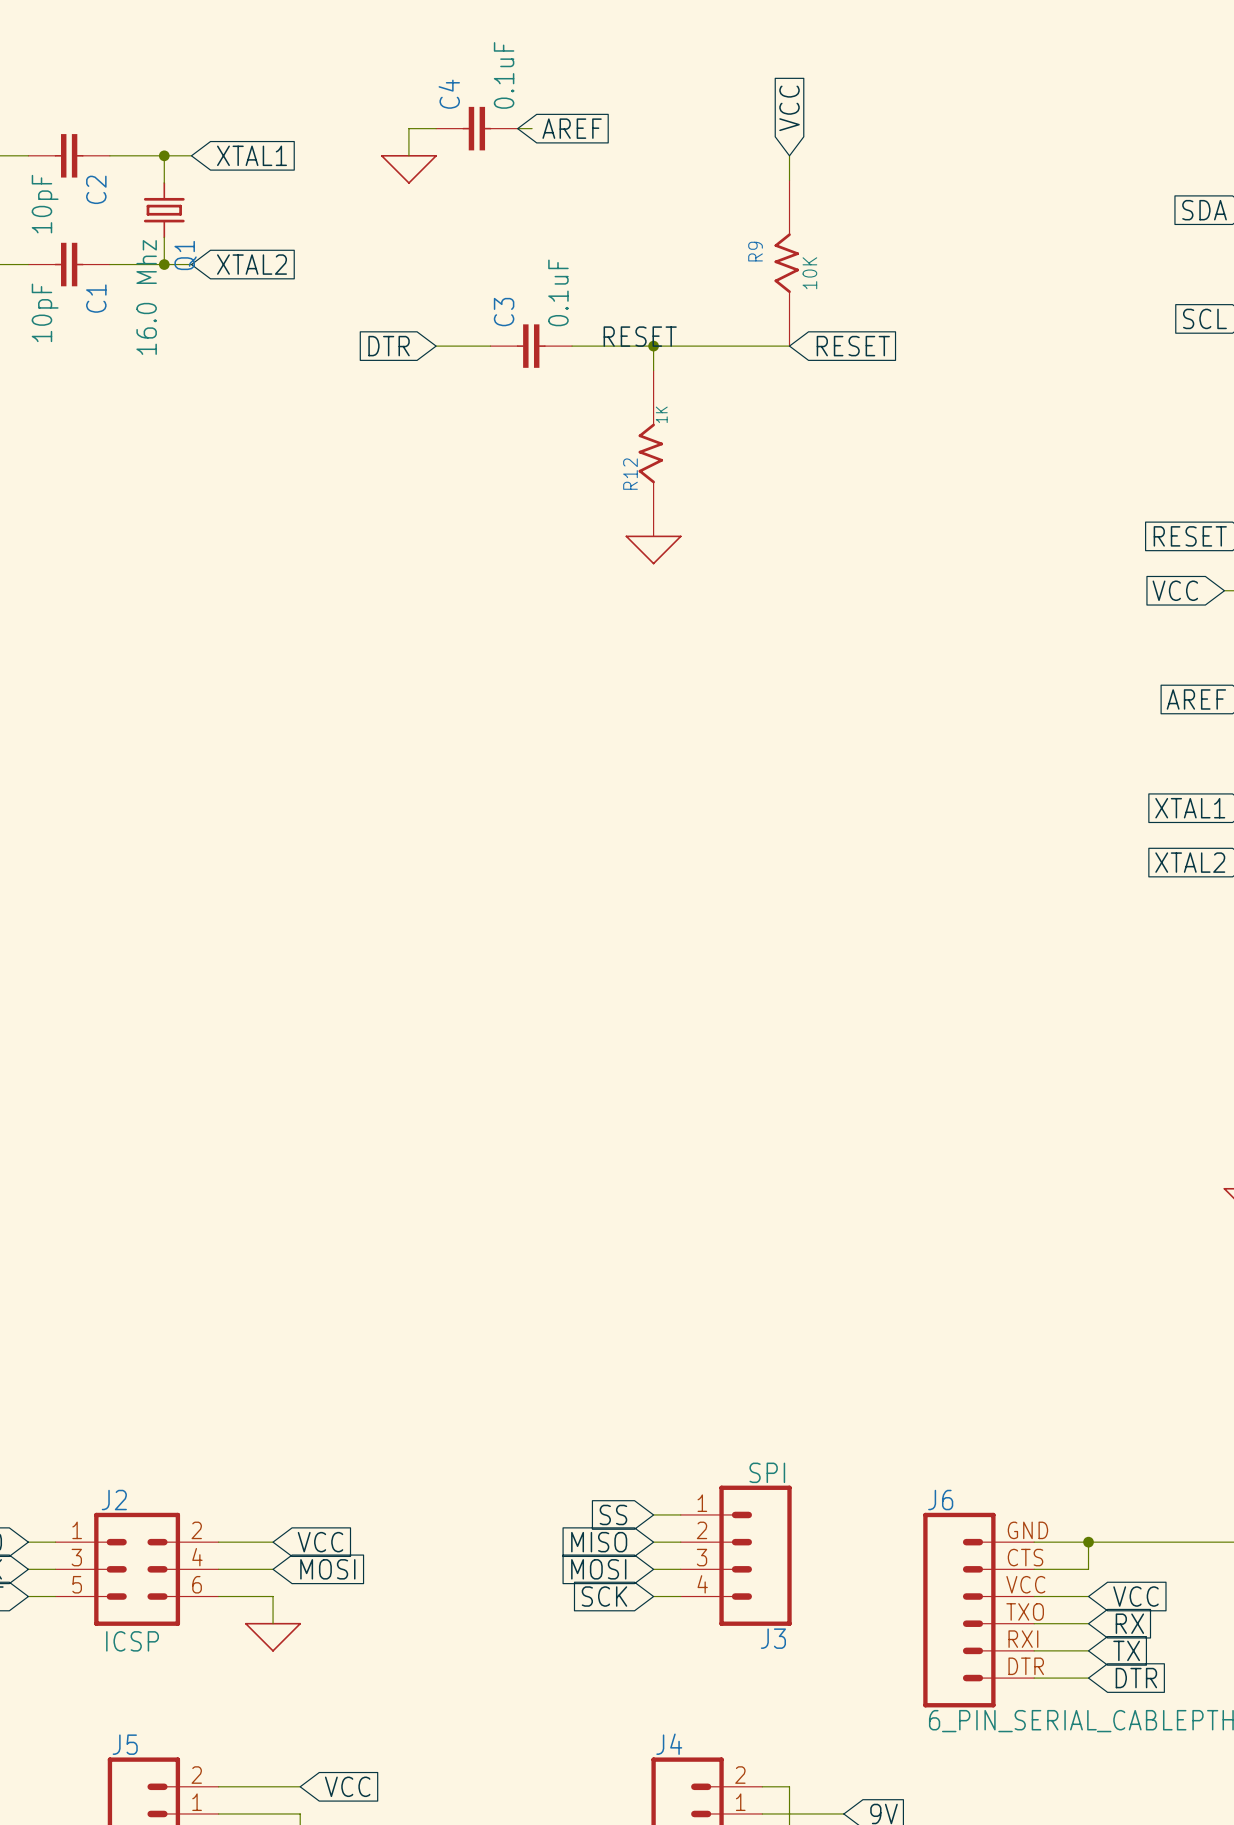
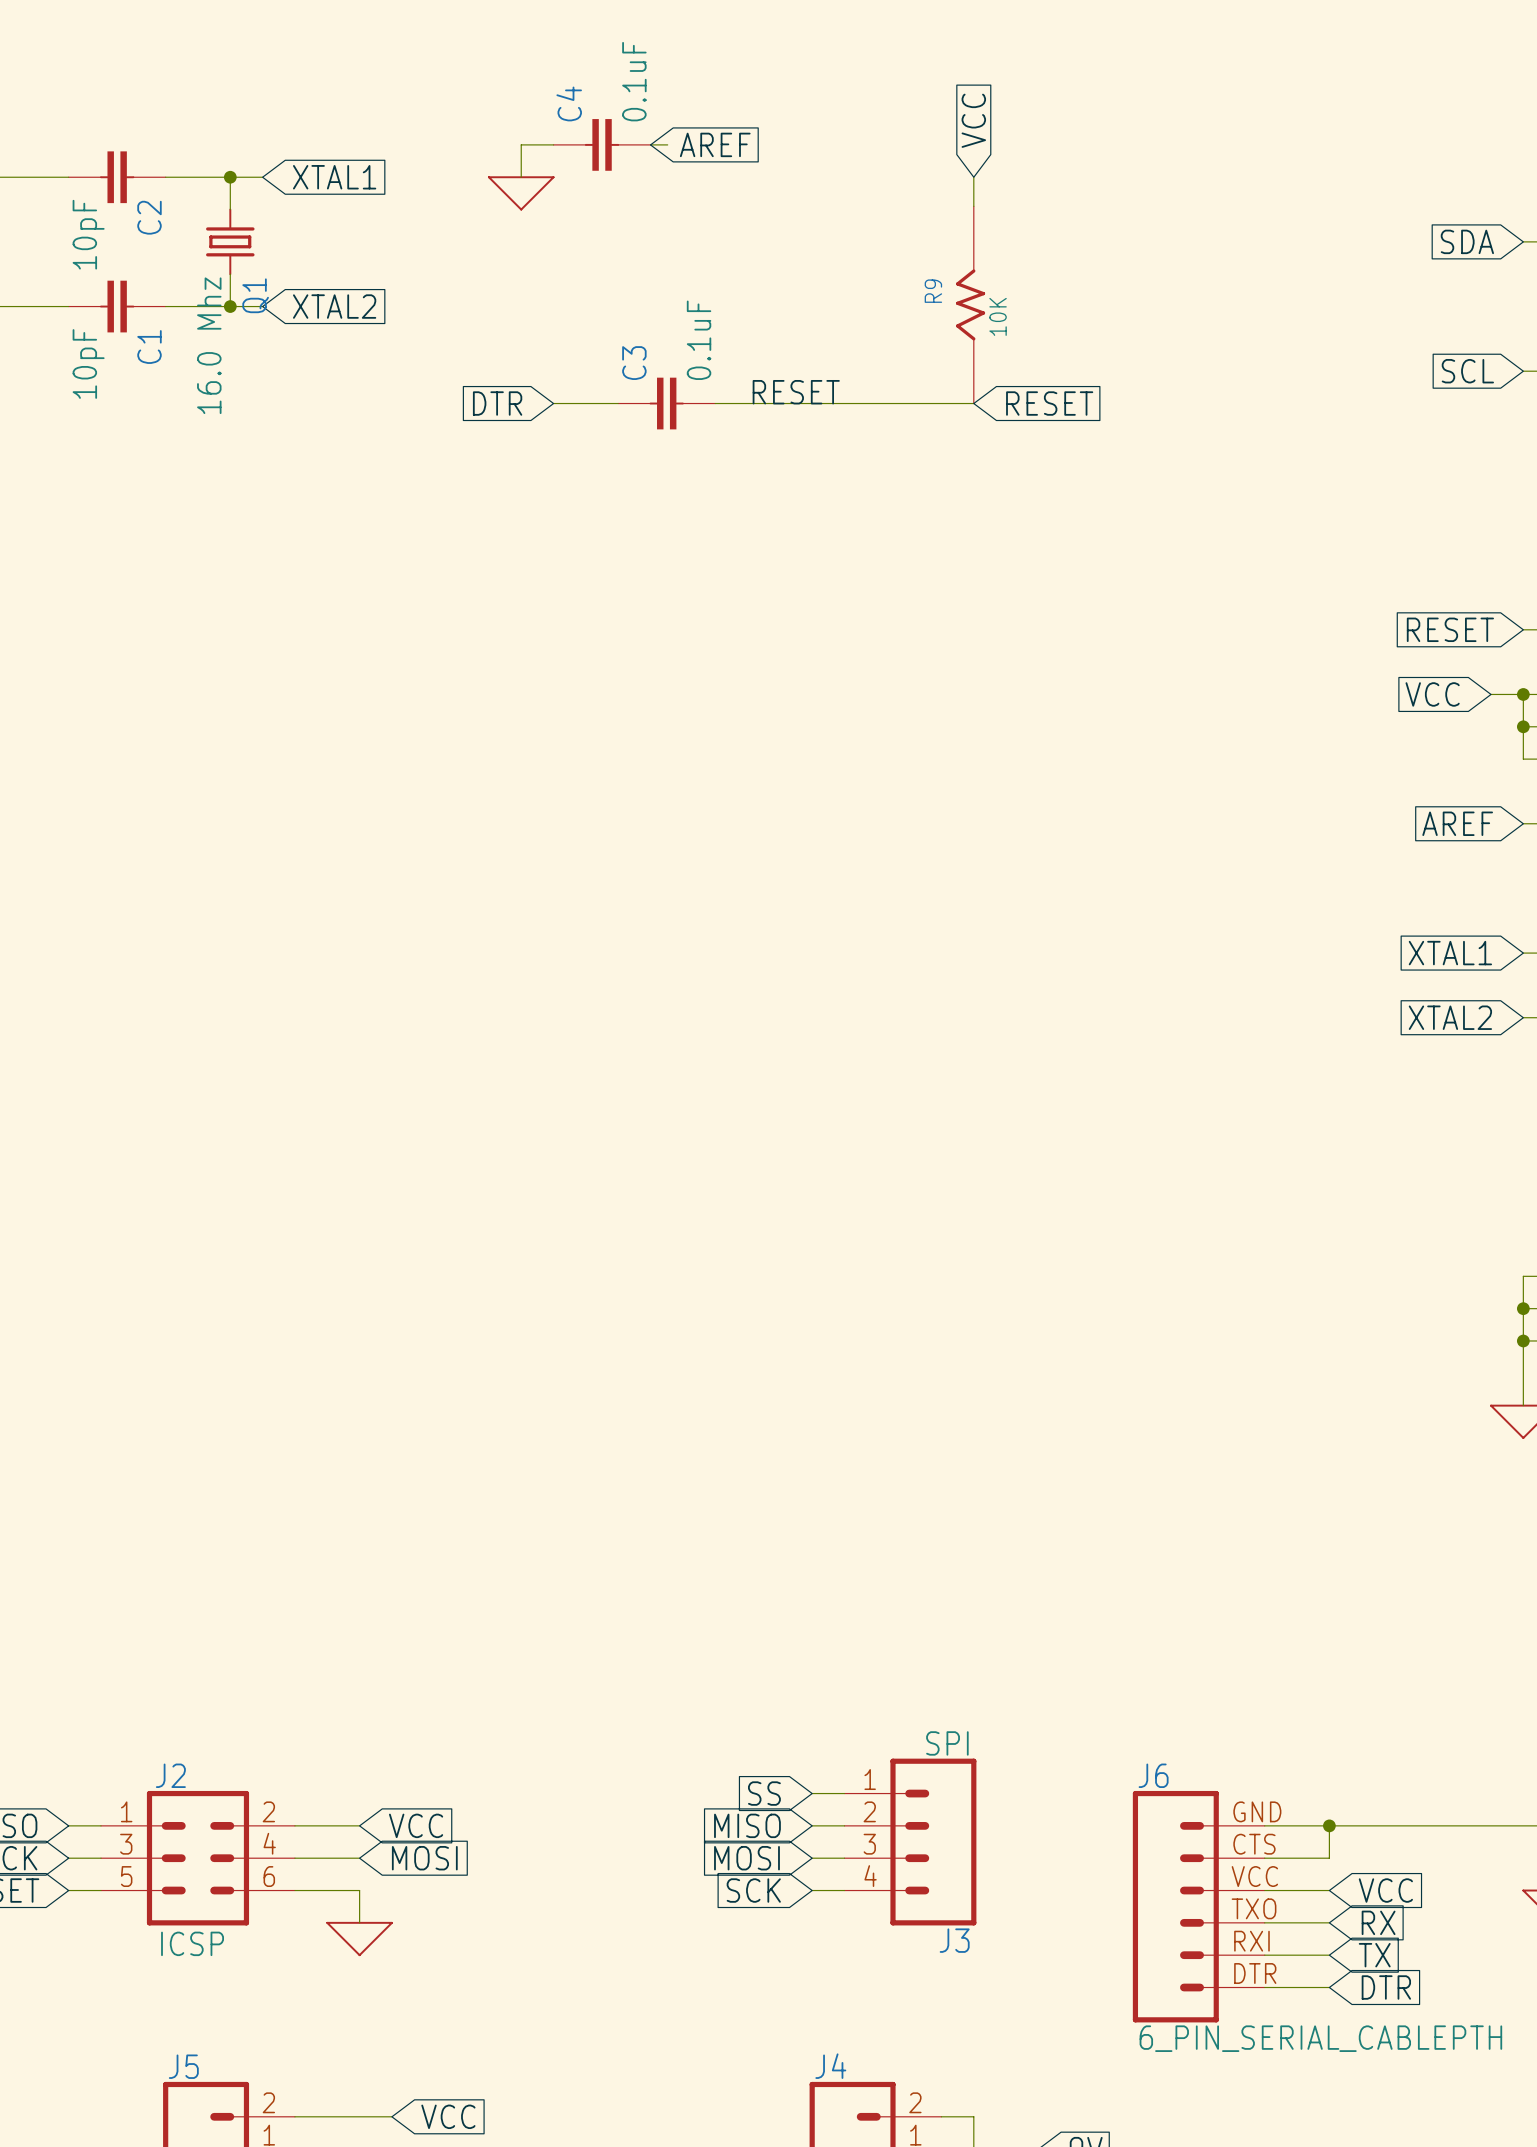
wire: (653, 346) (653, 370) -> none
junction: (653, 346) -> none
R12: 1K (650, 453) -> none
power symbol: (653, 549) -> none

